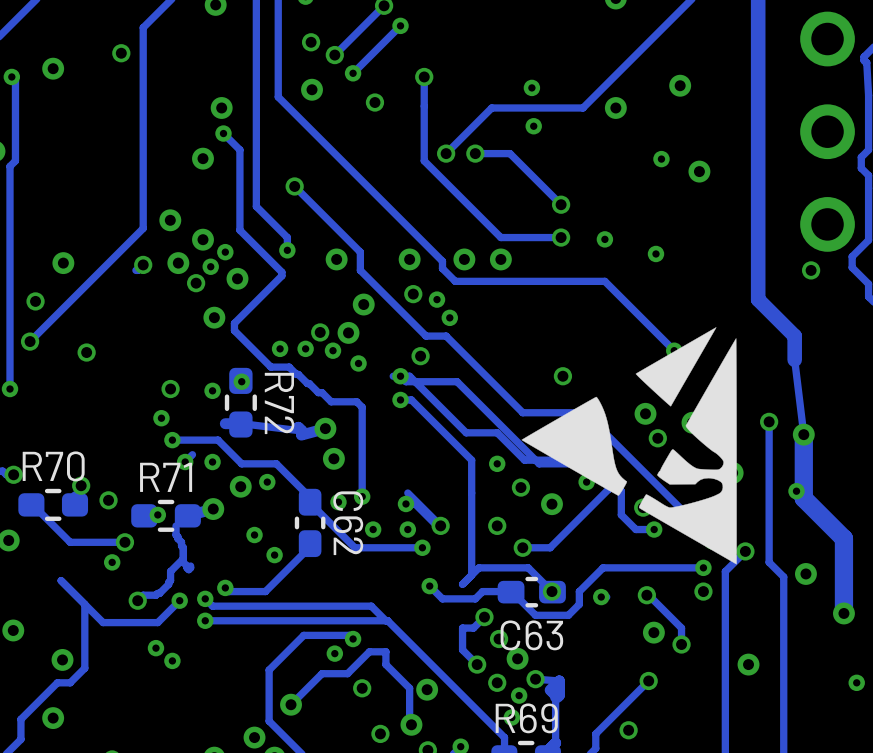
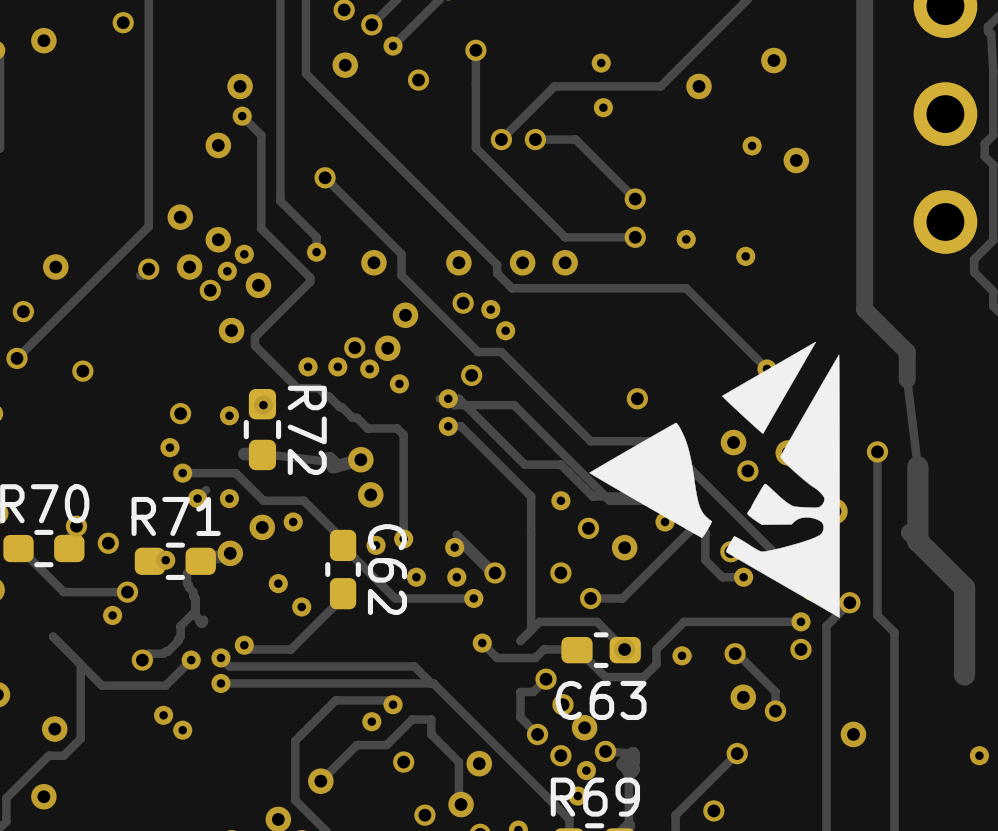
via: (811, 270) -> none
via: (803, 434) -> none
via: (796, 491) -> none
via: (805, 573) -> none
via: (843, 613) -> none

